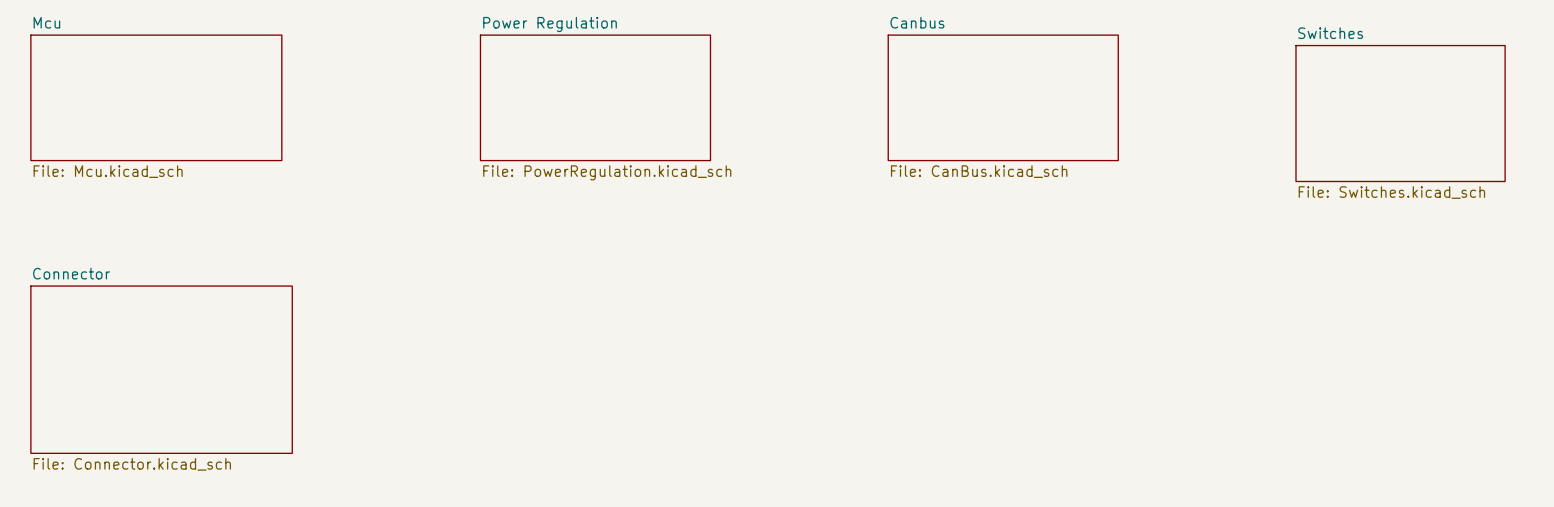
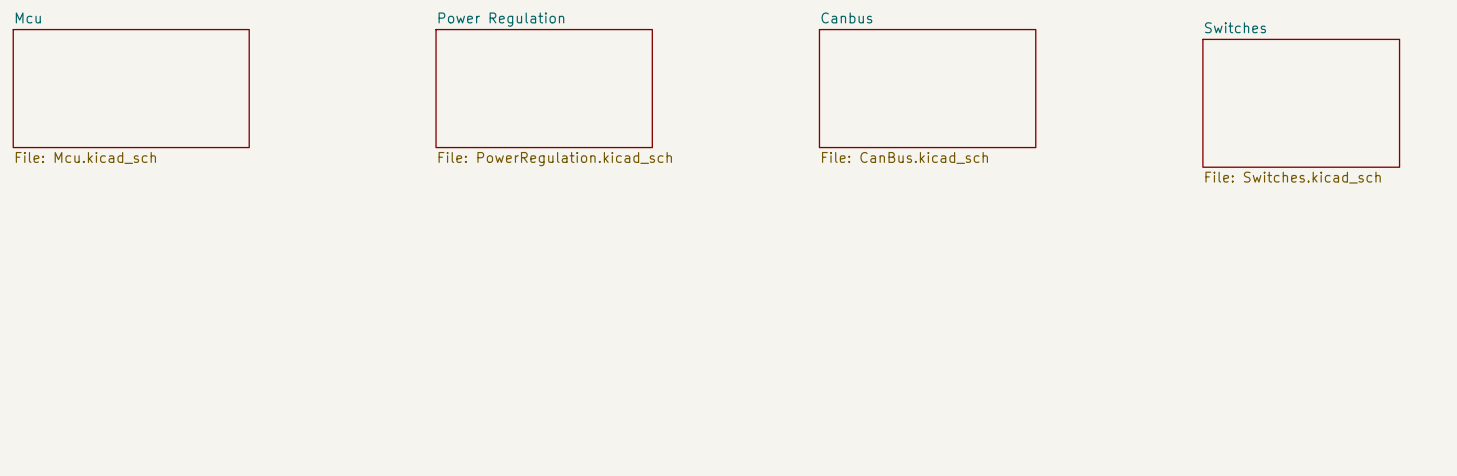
sheet Connector: File: Connector.kicad_sch (161, 369) -> none

